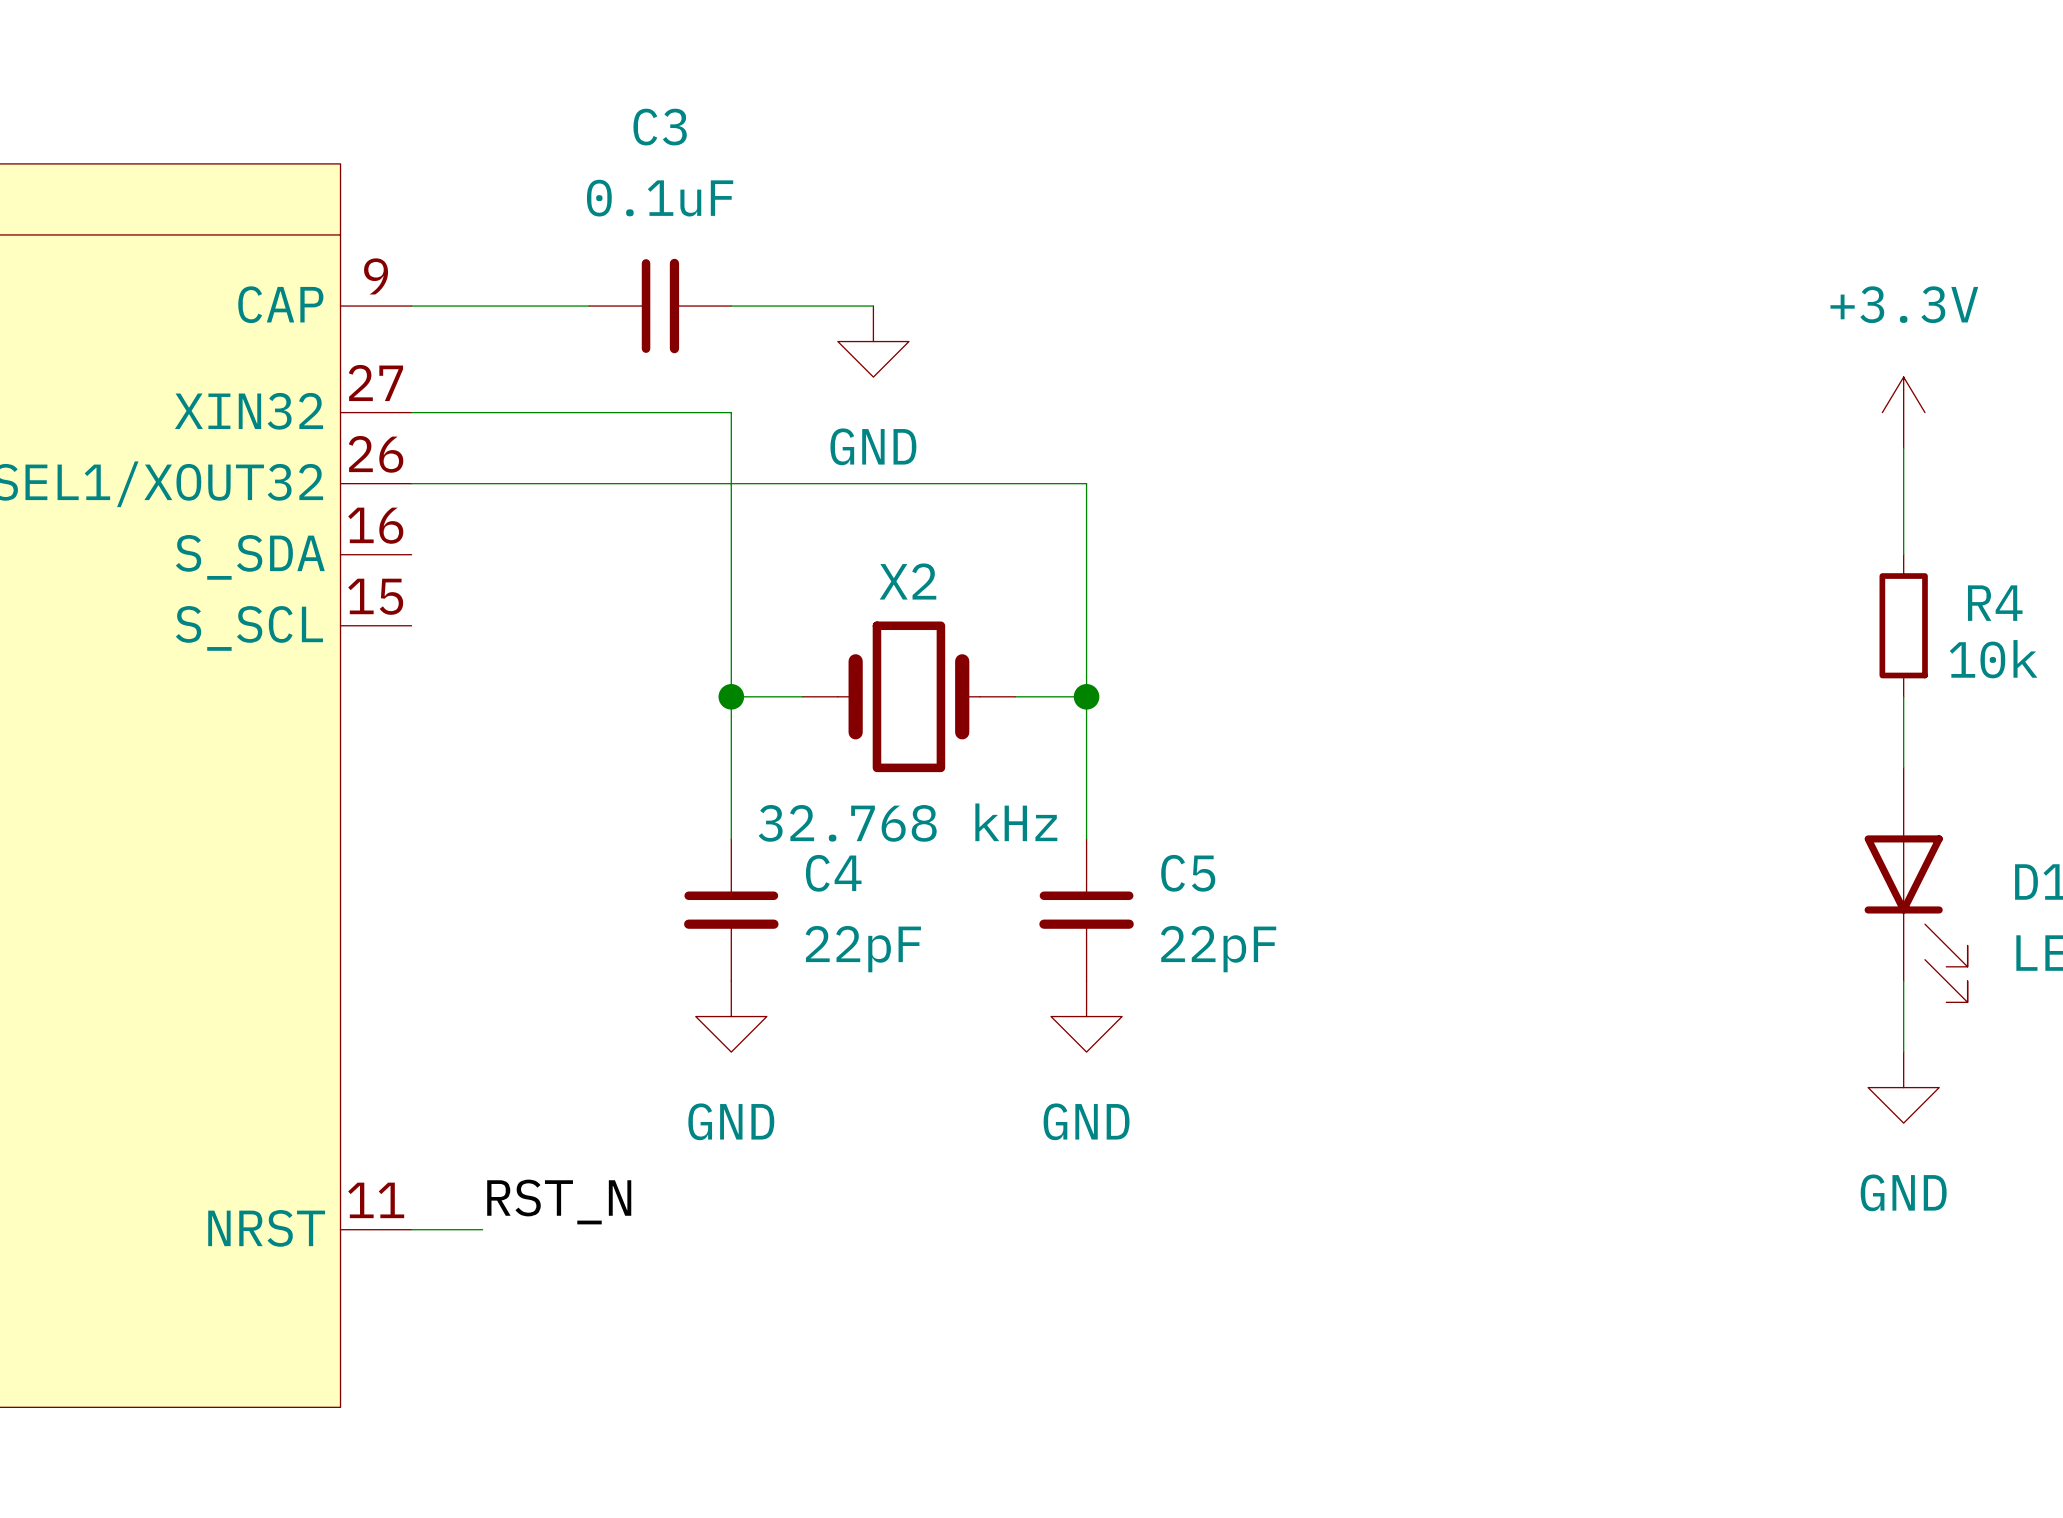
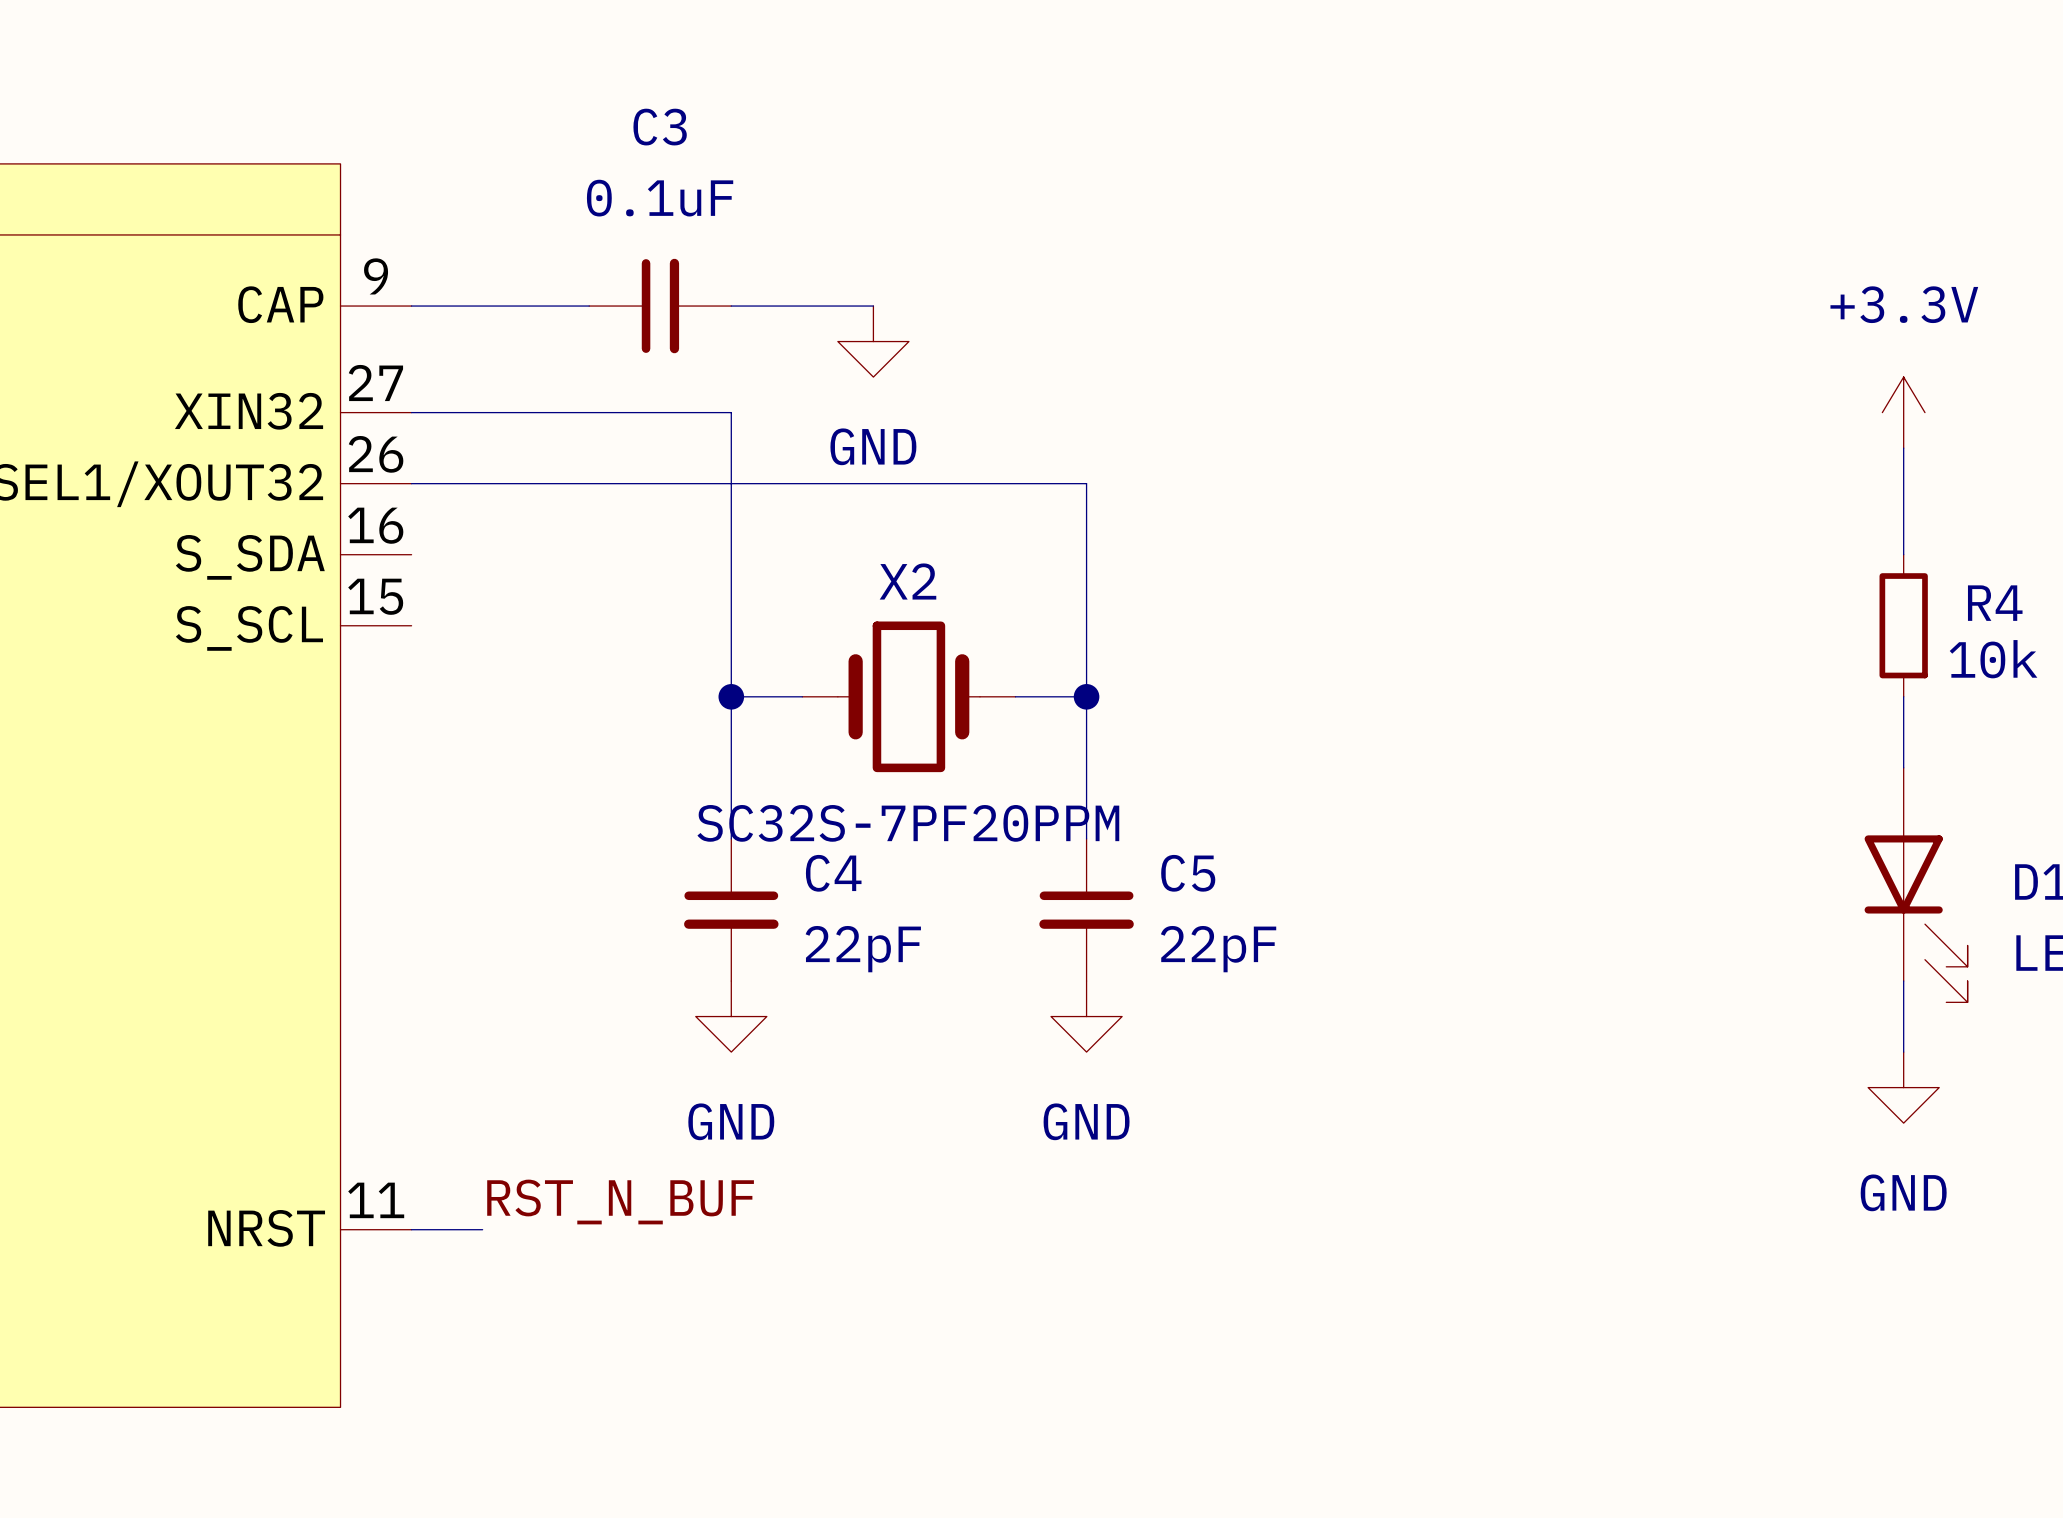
X2 value: 32.768 kHz (907, 822) -> SC32S-7PF20PPM (908, 823)
label: RST_N (559, 1202) -> RST_N_BUF (620, 1202)

